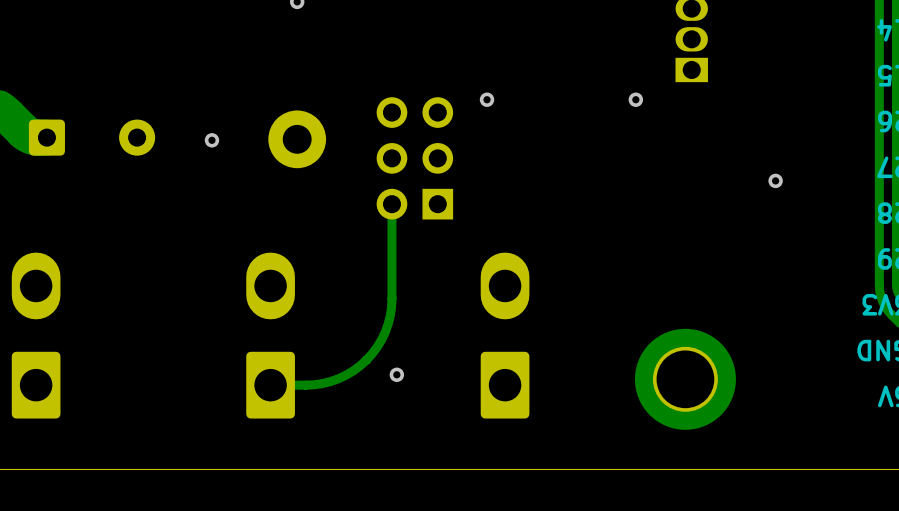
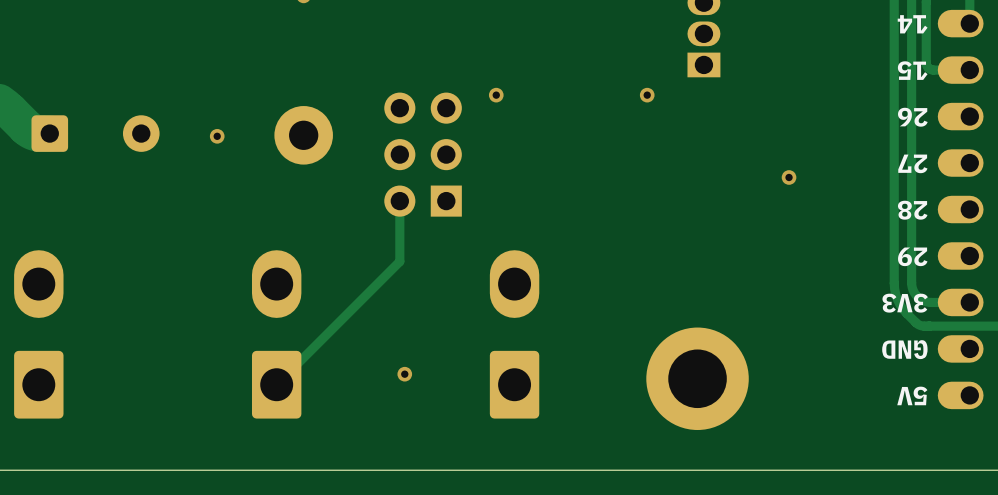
track: (391, 263) (391, 307) (388, 323) (381, 339) (366, 359) (353, 370) (330, 381) (314, 384) (270, 385) -> (399, 261) (276, 384)

